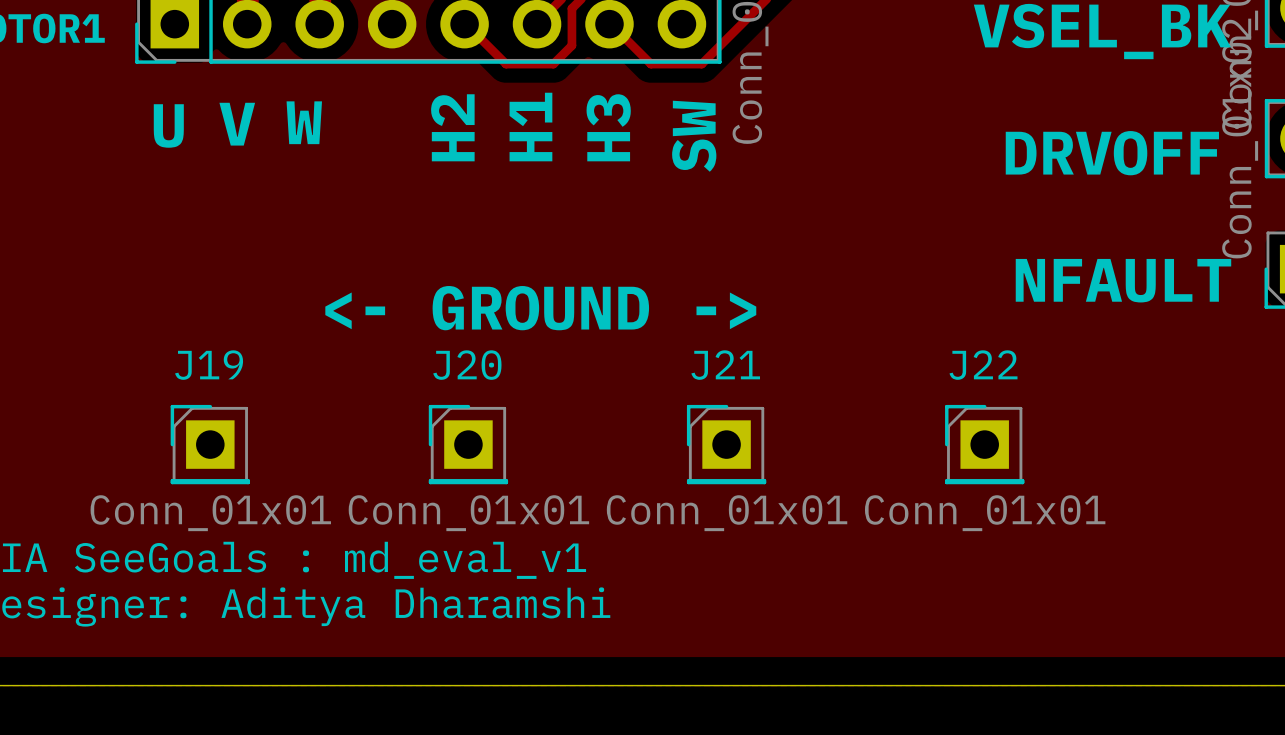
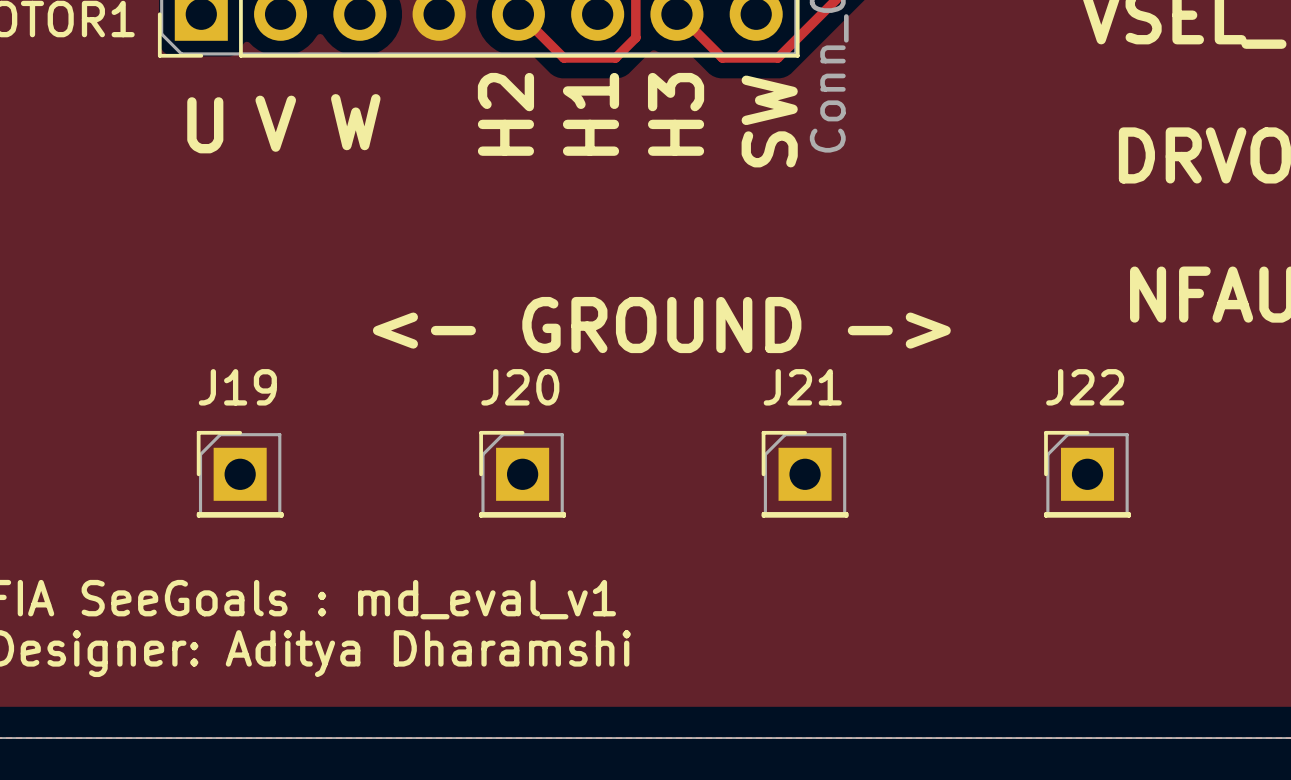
J19 value: Conn_01x01 (210, 513) -> none
J20 value: Conn_01x01 (468, 513) -> none
J21 value: Conn_01x01 (727, 513) -> none
J22 value: Conn_01x01 (985, 513) -> none

